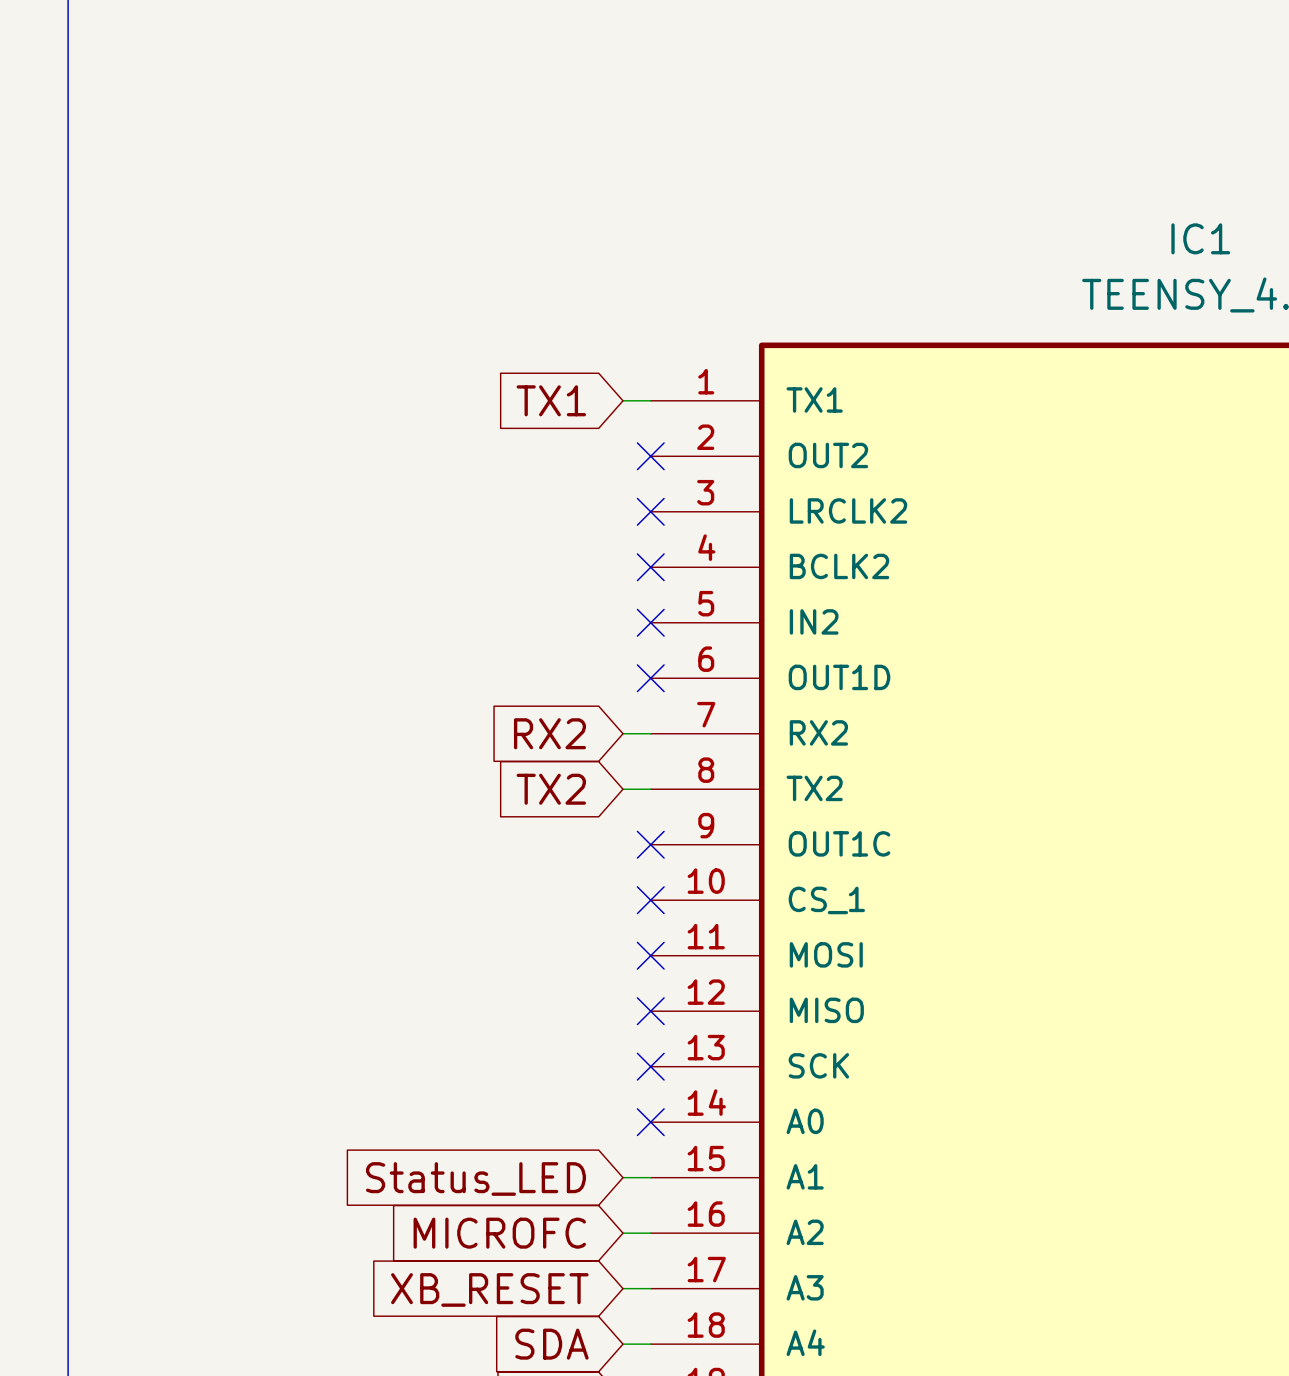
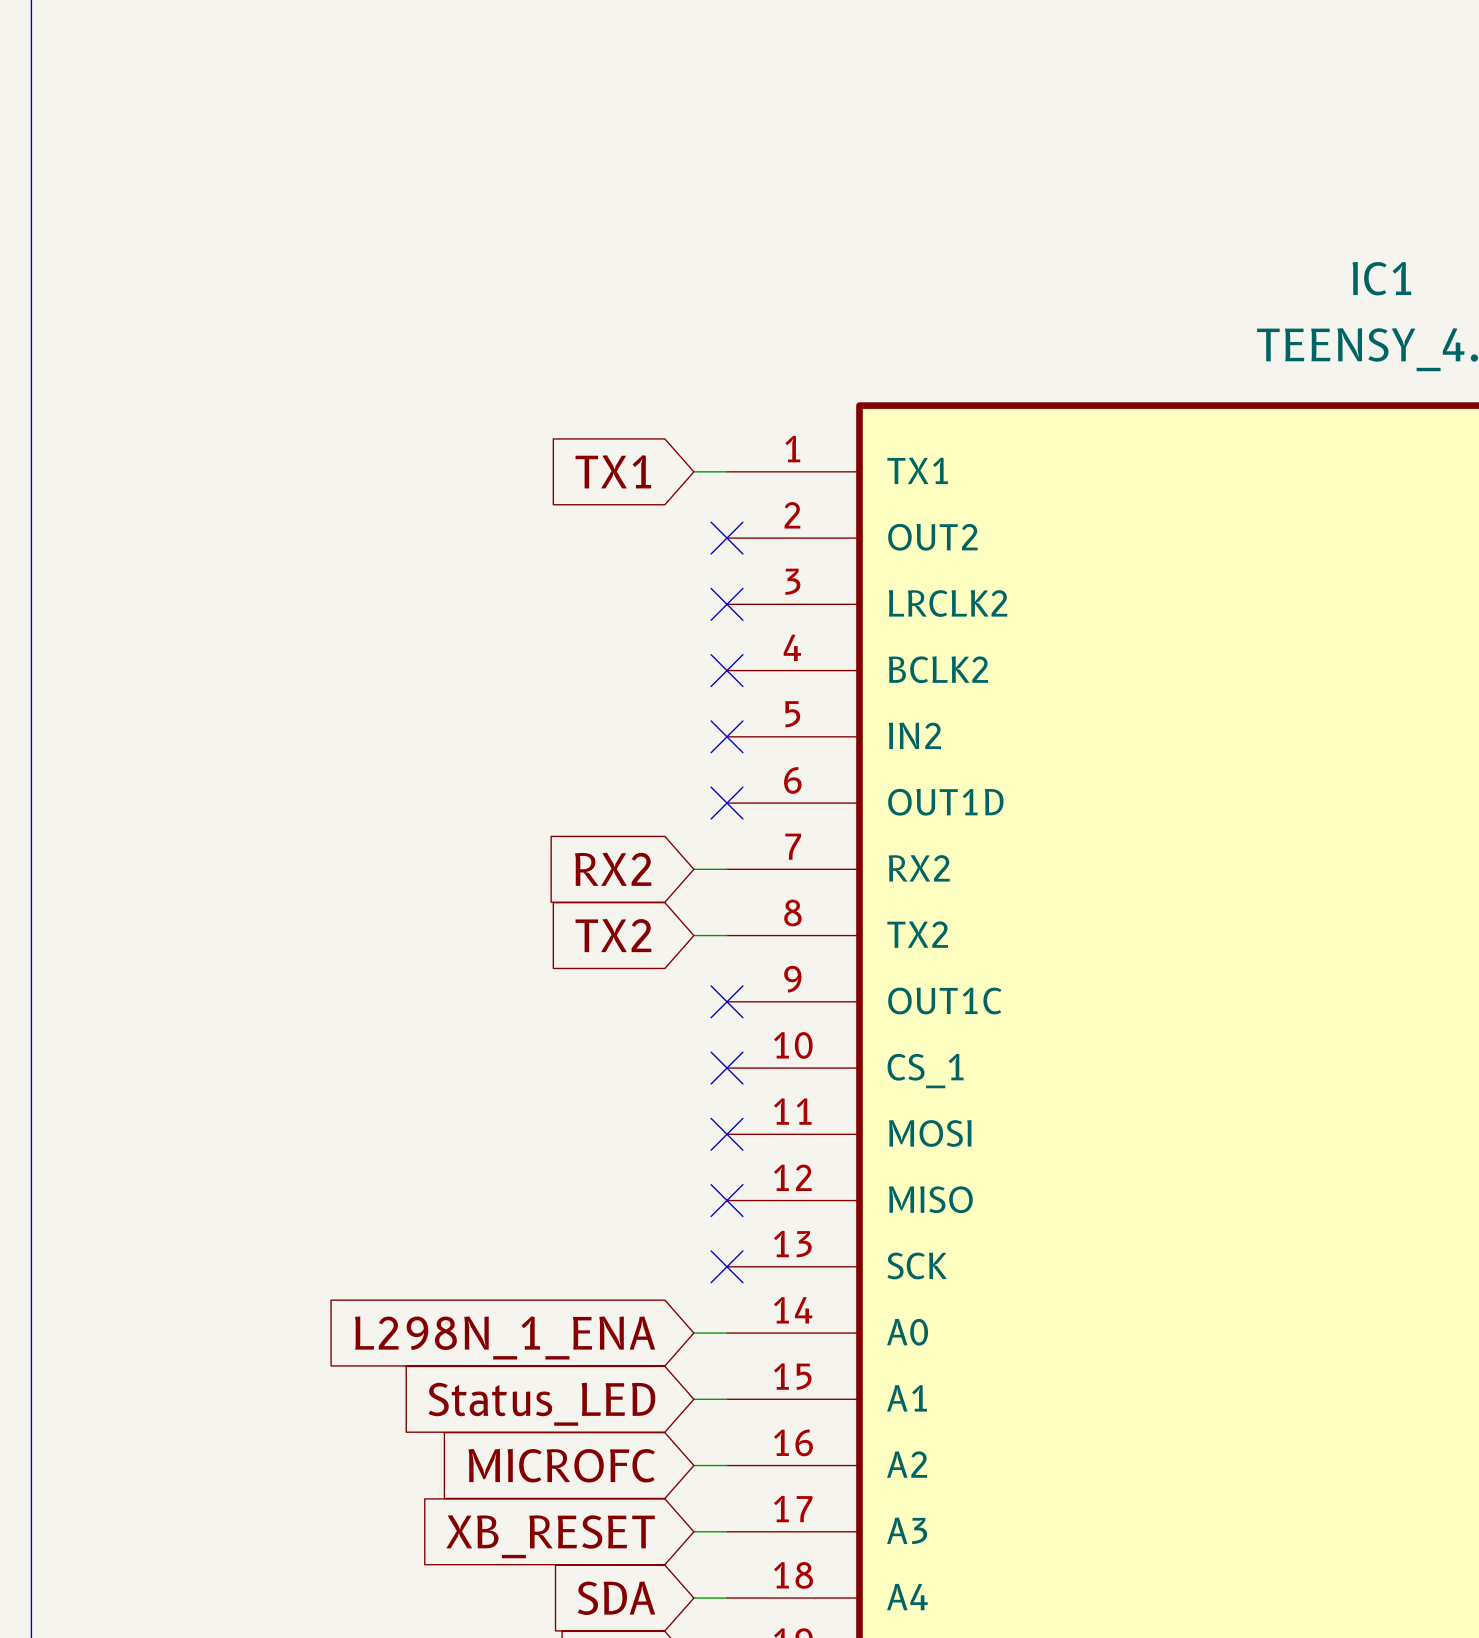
wire: none -> (693, 1333) (727, 1333)
no-connect mark: (650, 1122) -> none
global label: none -> L298N_1_ENA (505, 1338)

